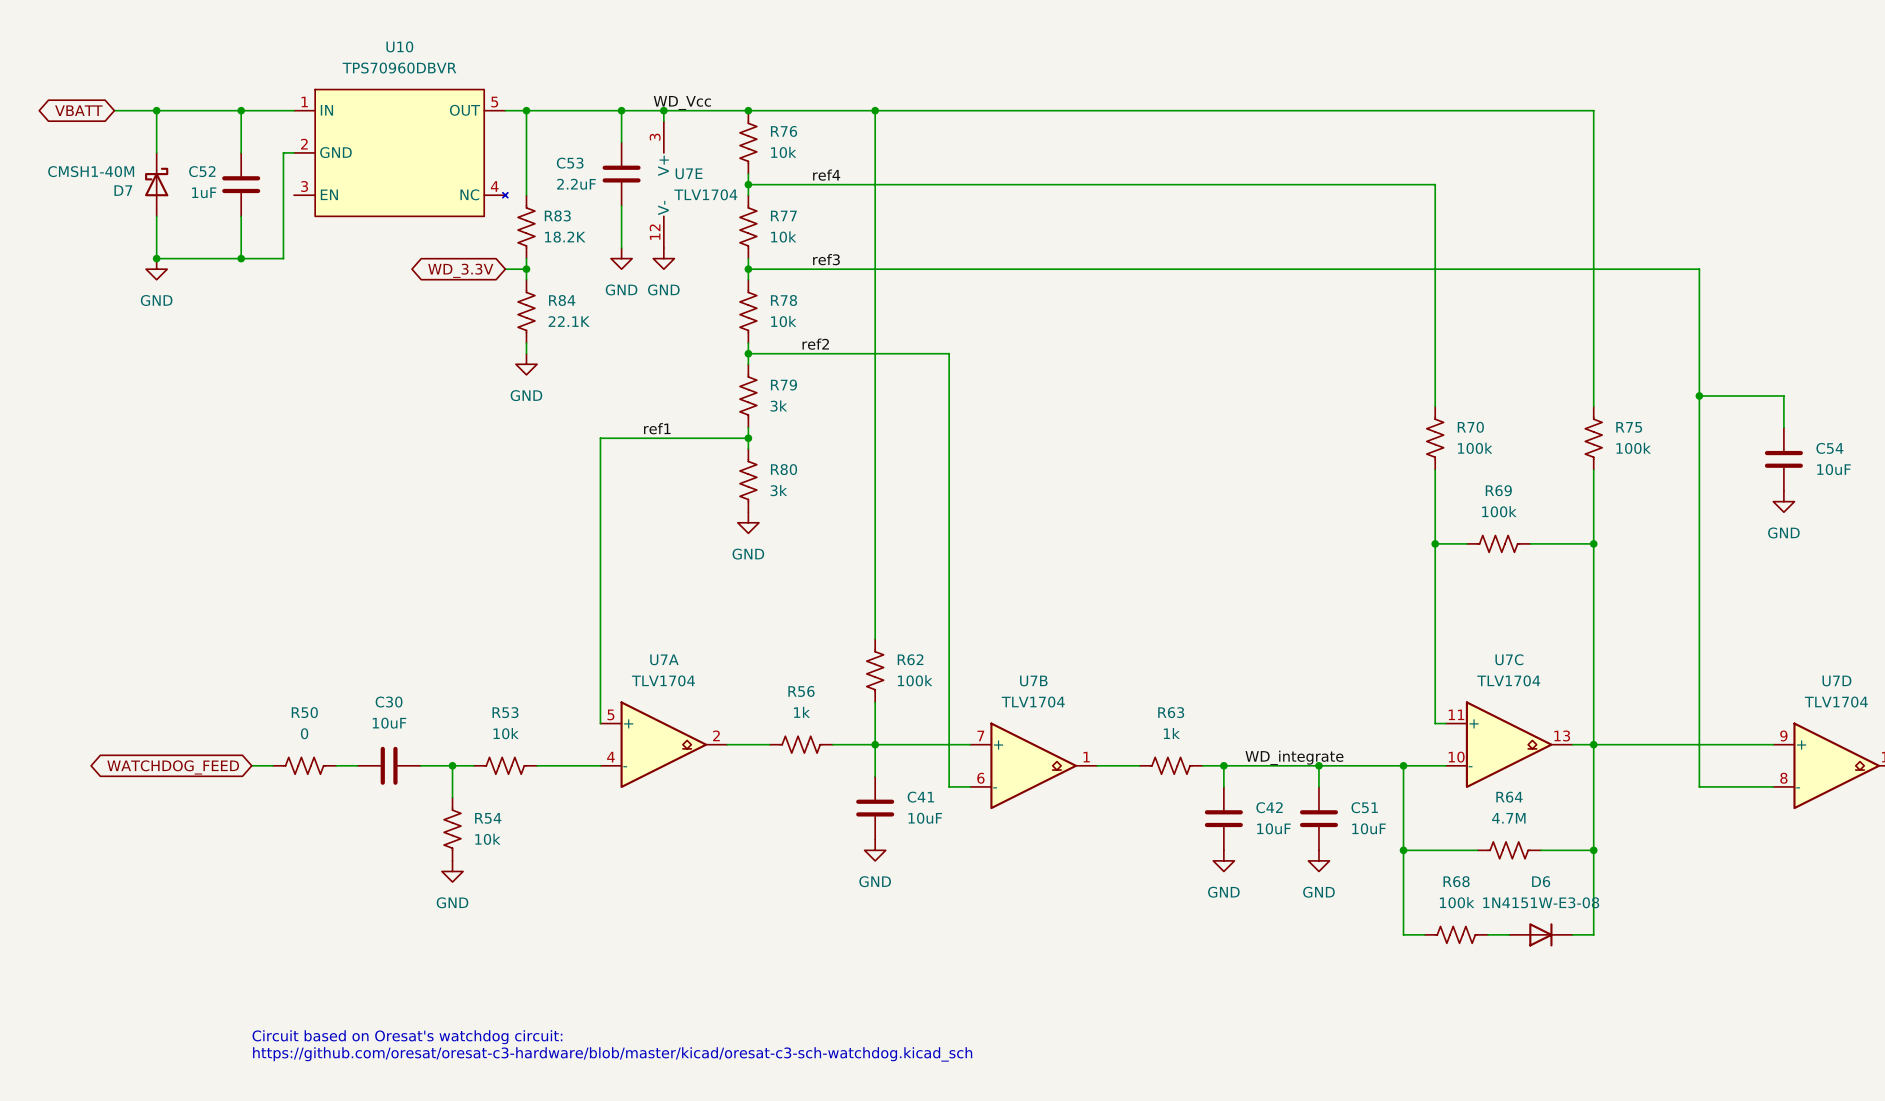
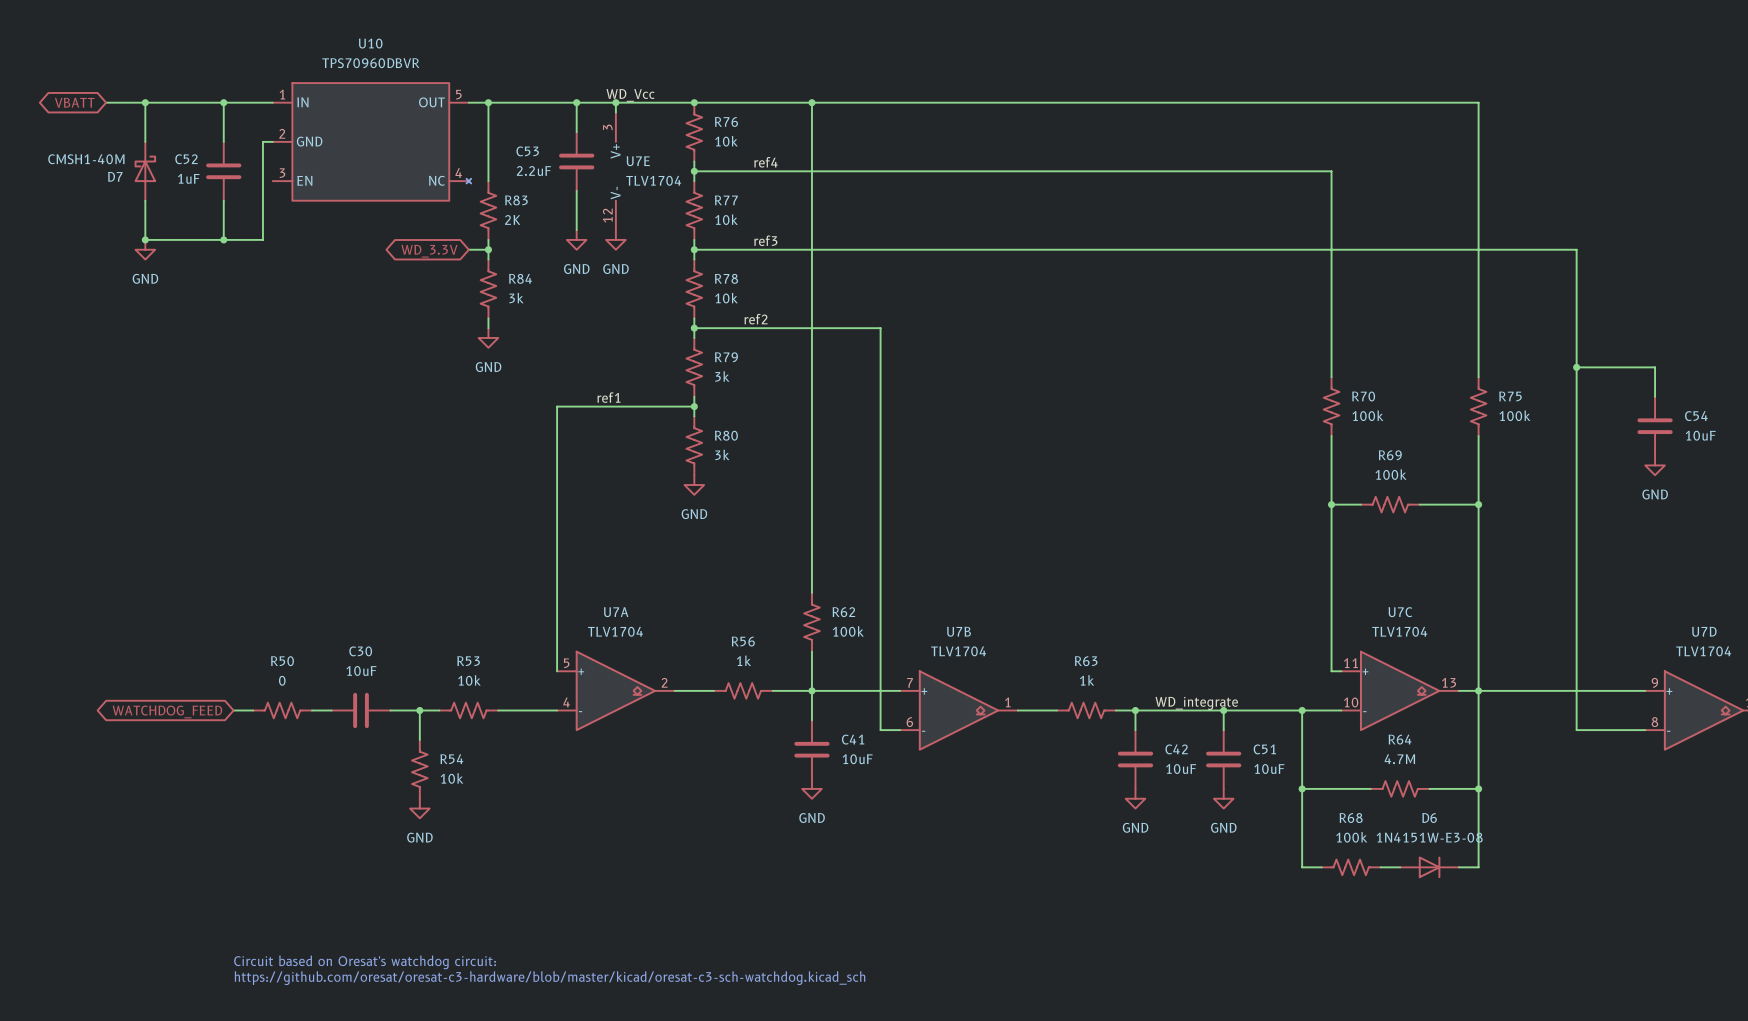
R83 value: 18.2K (565, 237) -> 2K (512, 219)
R84 value: 22.1K (569, 321) -> 3k (516, 298)

